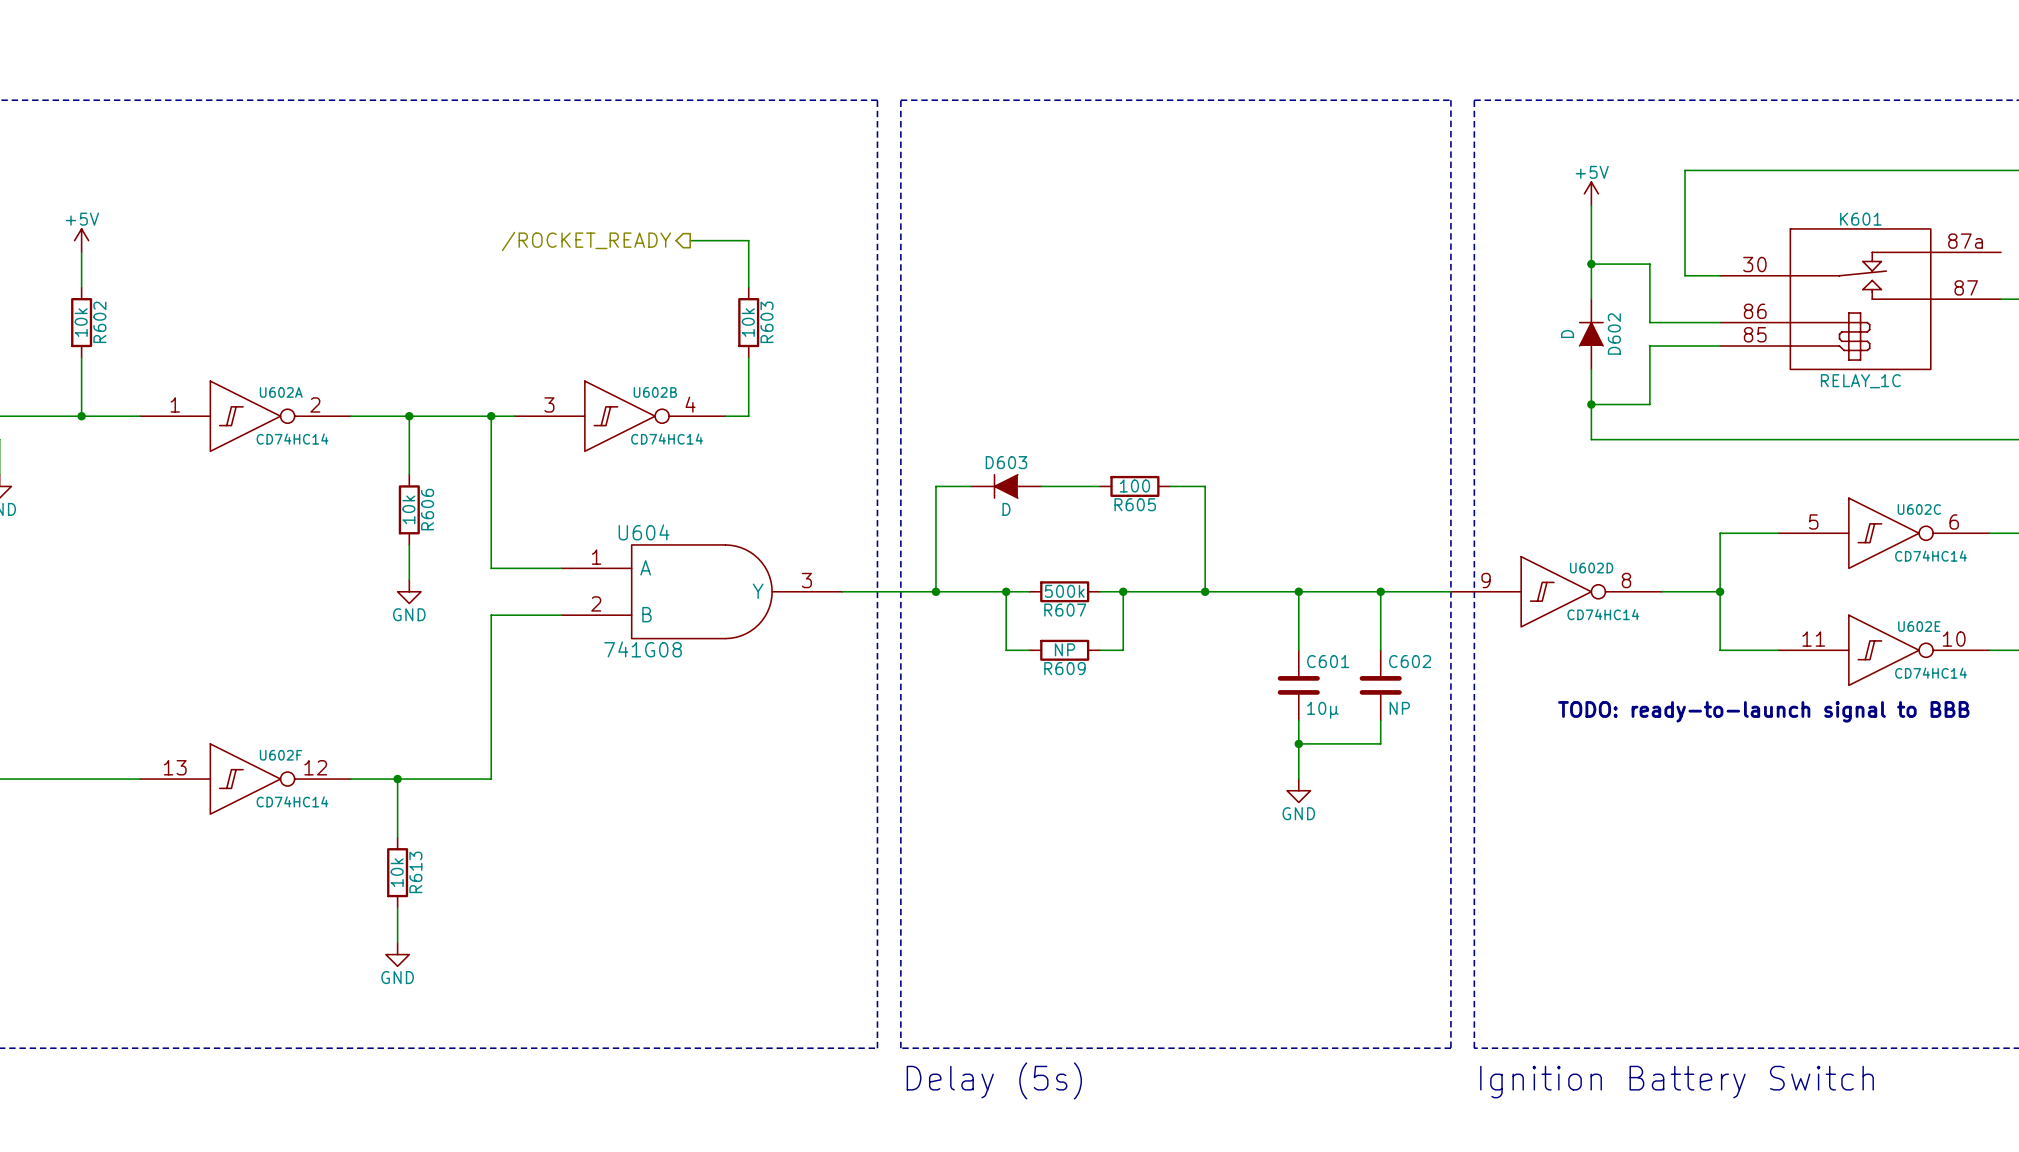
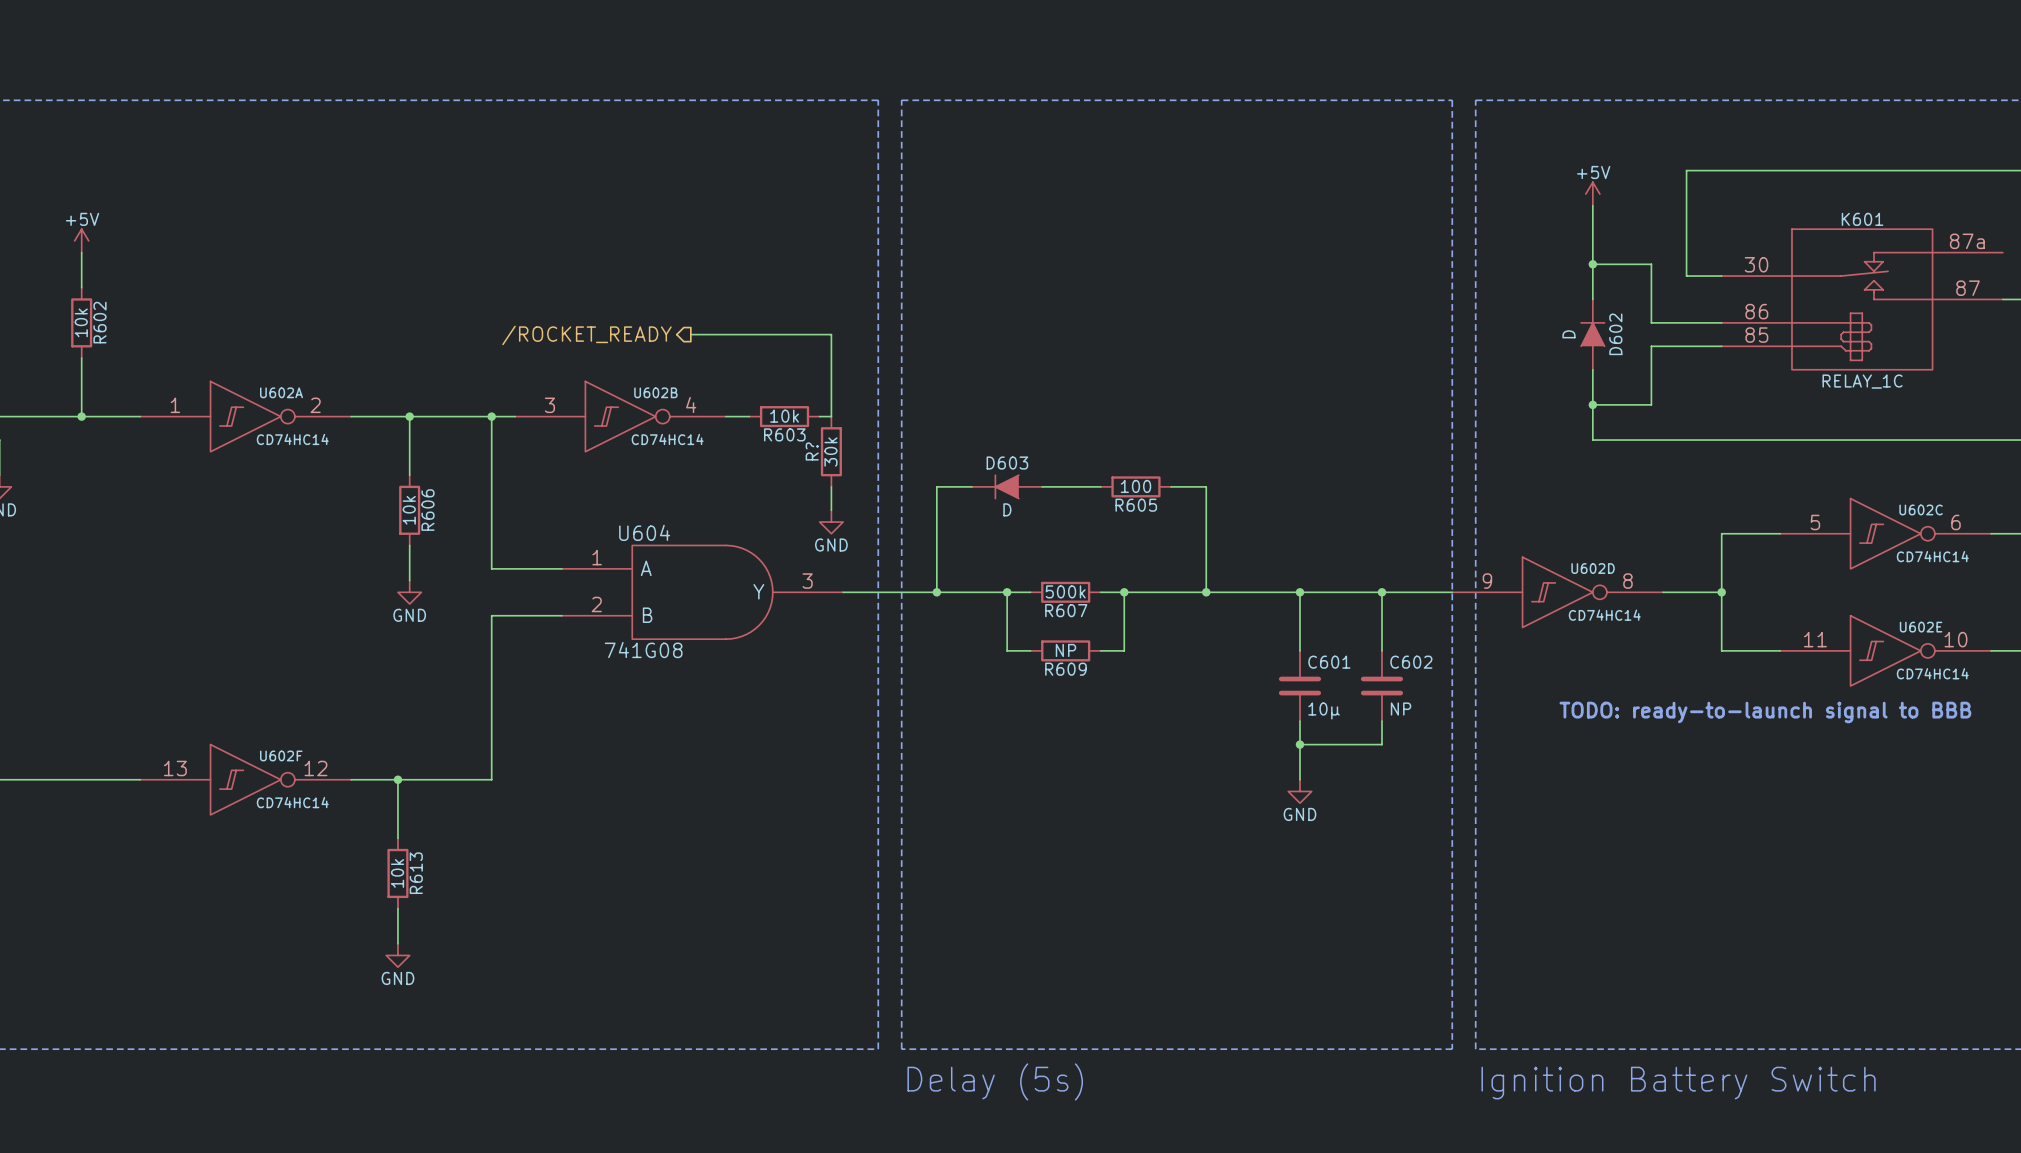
wire: (690, 240) (748, 240) (748, 287) -> none
hierarchical label position: /ROCKET_READY (586, 241) -> /ROCKET_READY (586, 335)
R603 rotation: 0° (748, 322) -> 90° clockwise (784, 416)
R603 position: (748, 322) -> (784, 416)
wire: none -> (690, 334) (831, 334) (831, 416) (819, 416)
wire: (748, 357) (748, 416) -> none
R?: none -> 30k (831, 451)
wire: none -> (831, 486) (831, 510)
power symbol: none -> GND (831, 522)

